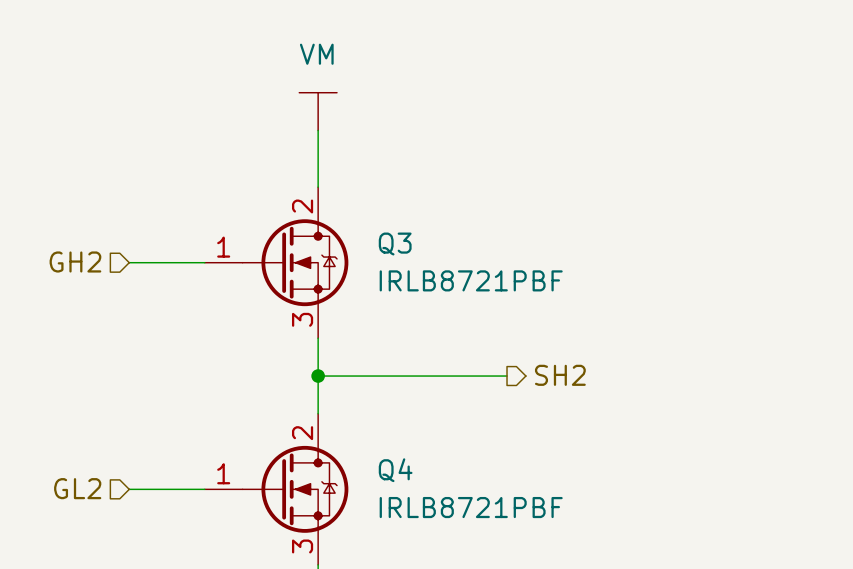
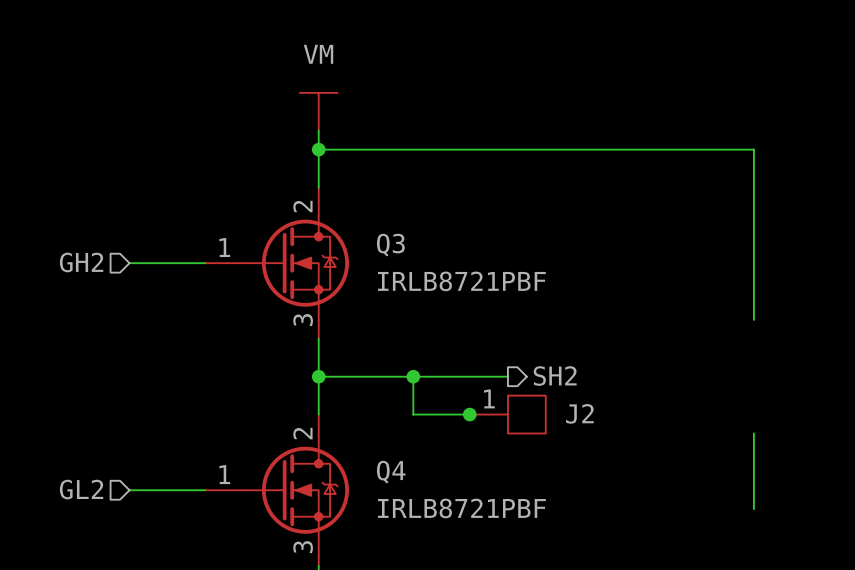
wire: none -> (318, 149) (753, 149) (753, 319)
junction: none -> (318, 149)
wire: none -> (413, 376) (413, 414) (470, 414)
junction: none -> (413, 376)
junction: none -> (469, 414)
J2: none -> (507, 414)
wire: none -> (753, 433) (753, 509)

